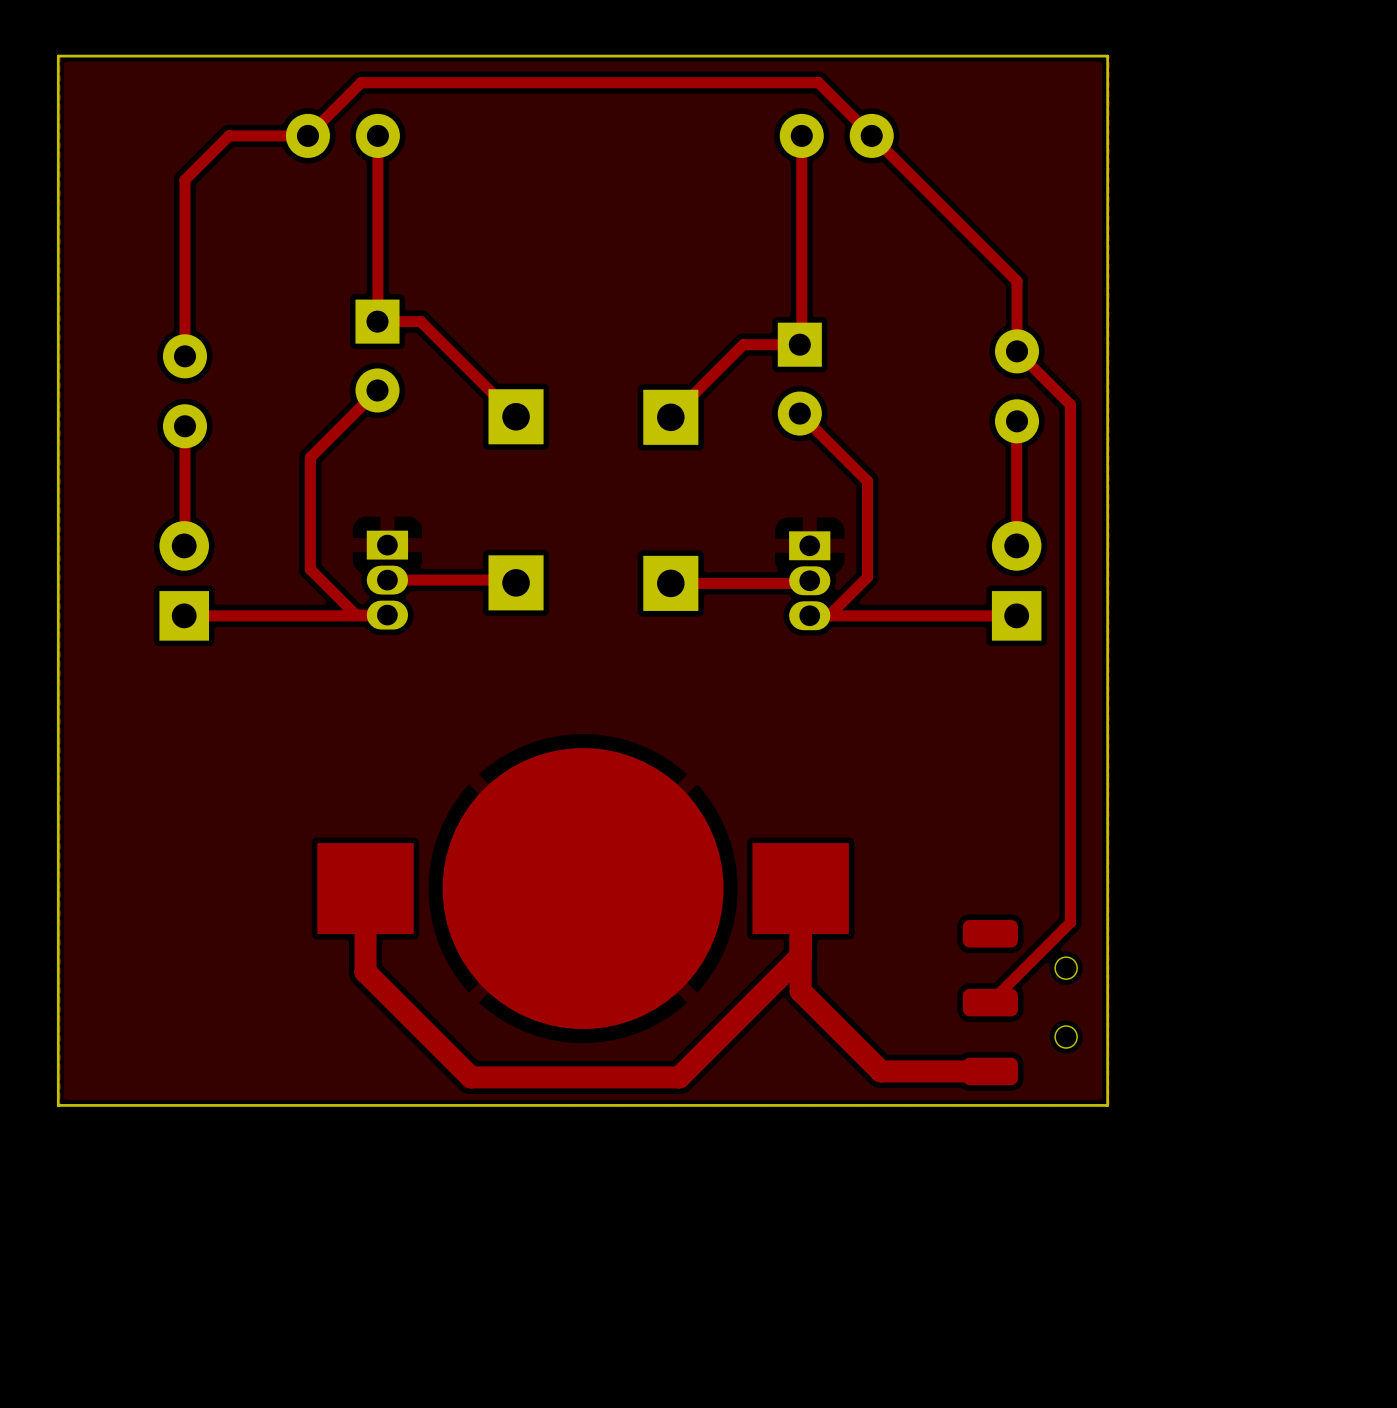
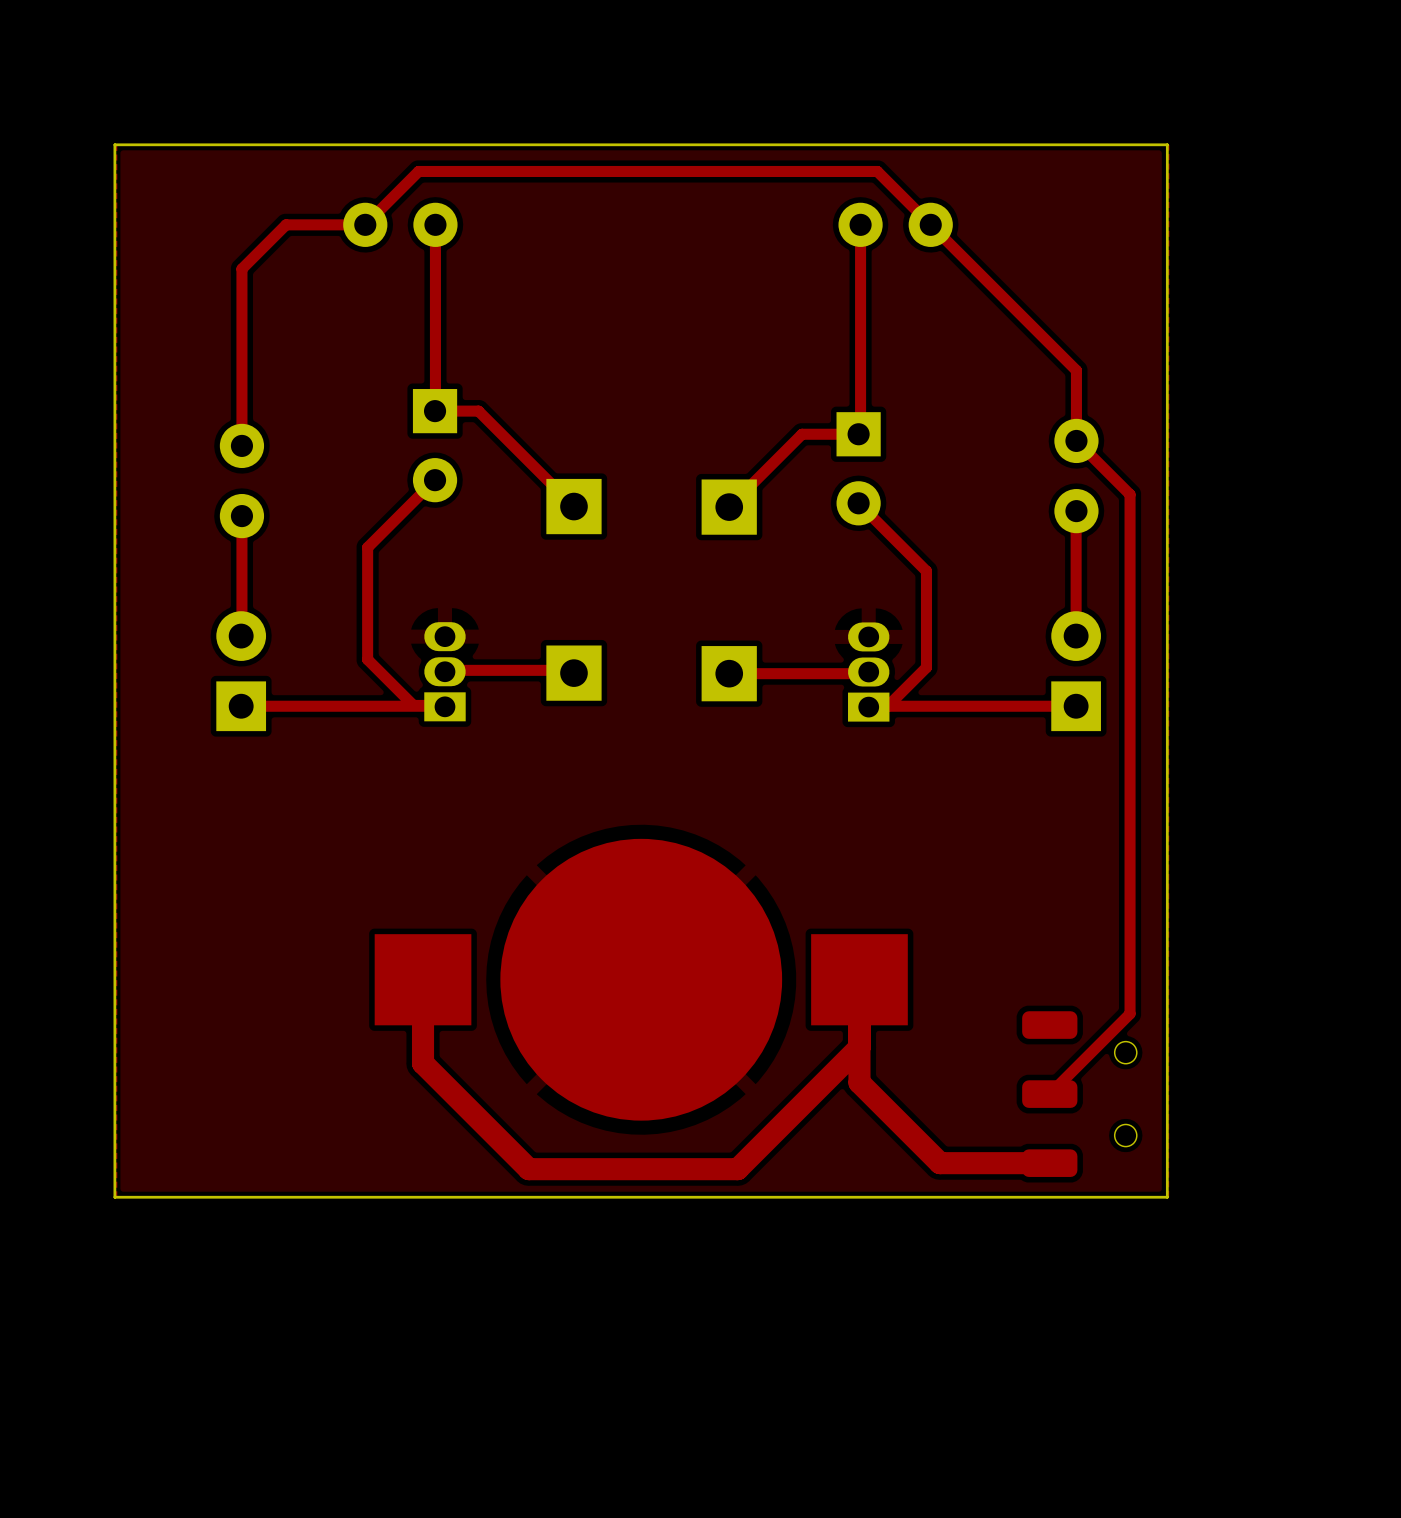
part rotation: 0° (387, 580) -> 180° (444, 671)
part rotation: 0° (809, 580) -> 180° (868, 672)
part footprint: [962, 919, 1078, 1086] -> [1022, 1011, 1137, 1177]

